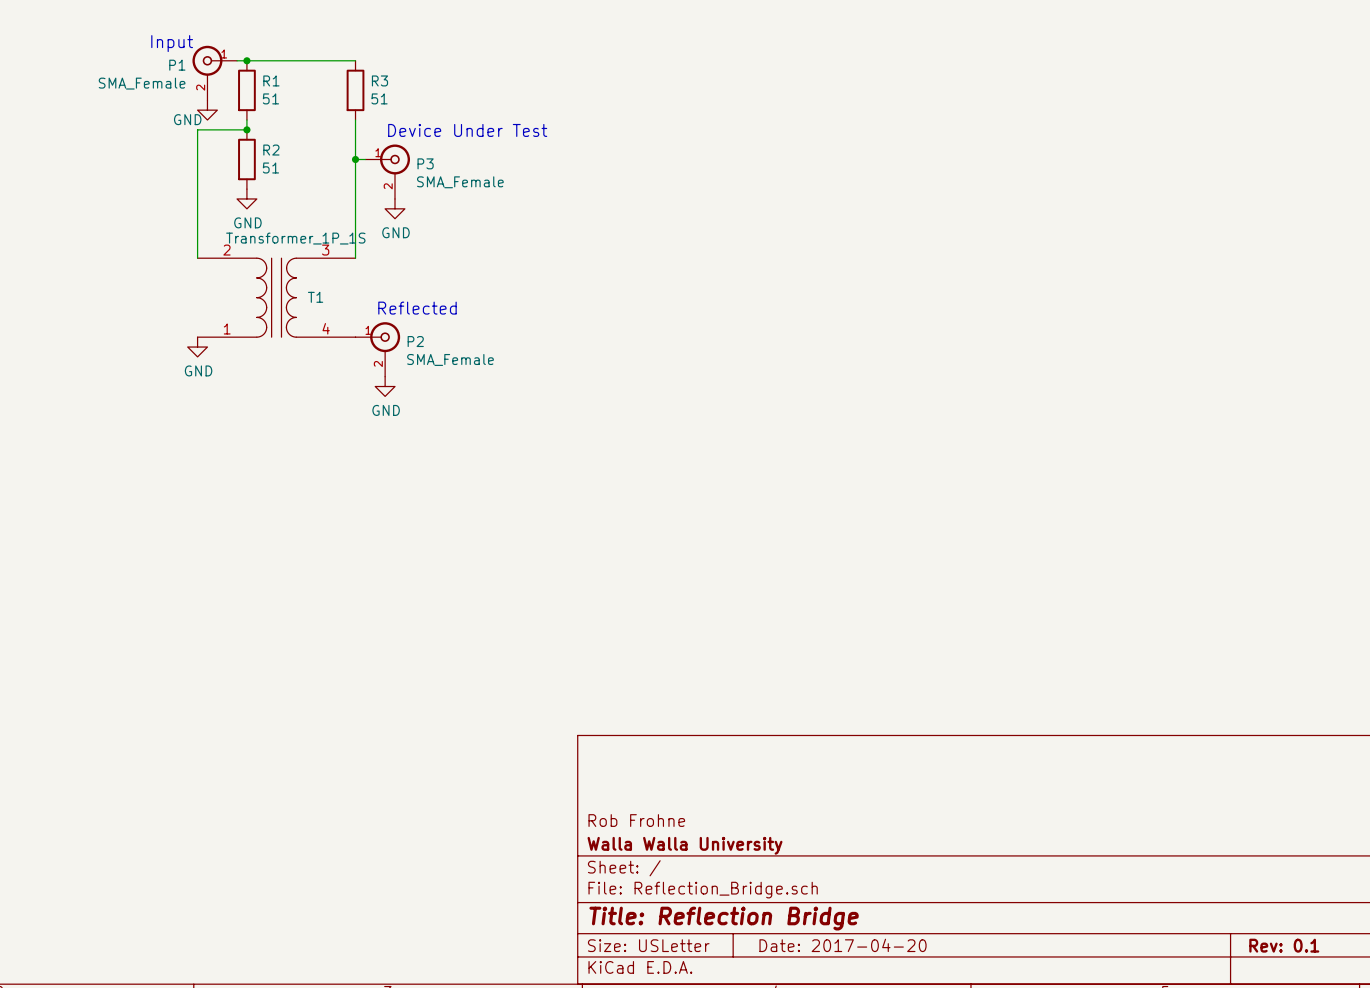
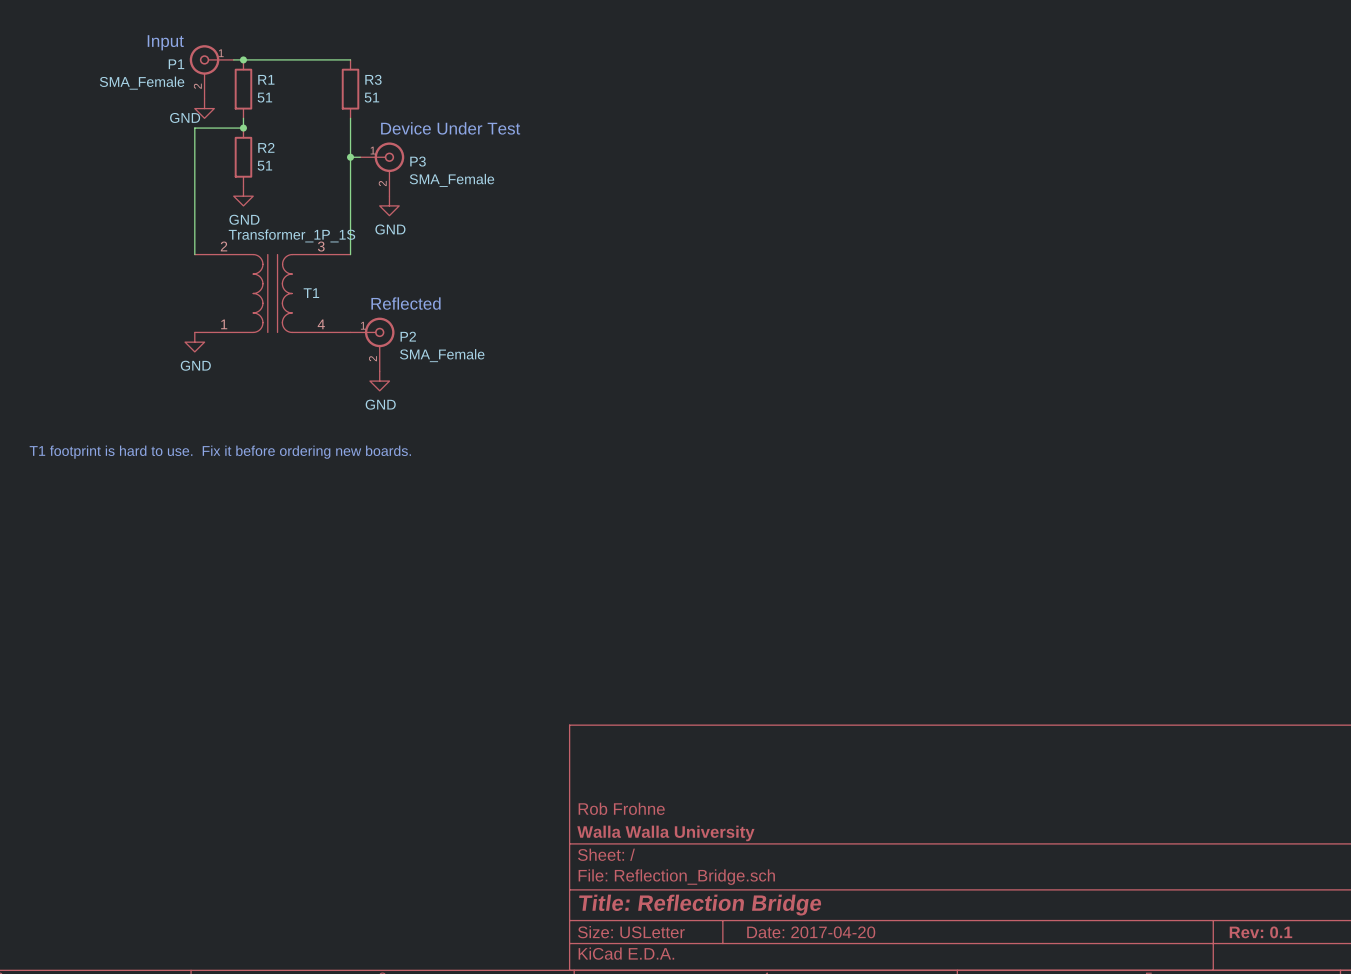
text: none -> T1 footprint is hard to use. Fix it before ordering new boards. (220, 452)

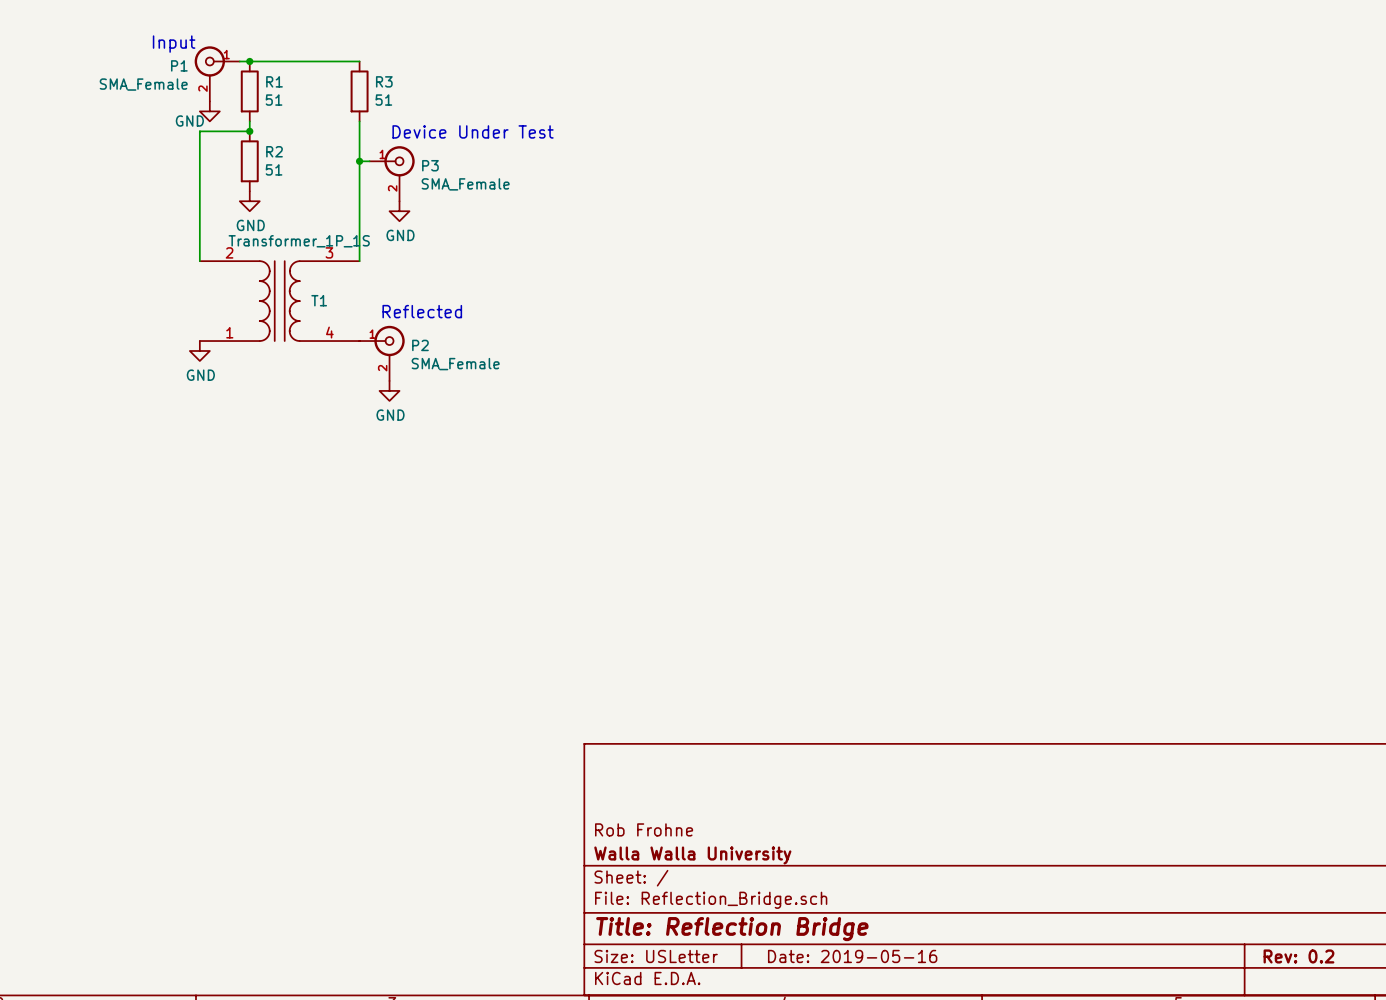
text: T1 footprint is hard to use. Fix it before ordering new boards. (220, 452) -> none
title block: Date: 2017-04-20 (811, 932) -> Date: 2019-05-16 (852, 956)
title block: Rev: 0.1 (1260, 932) -> Rev: 0.2 (1298, 956)

